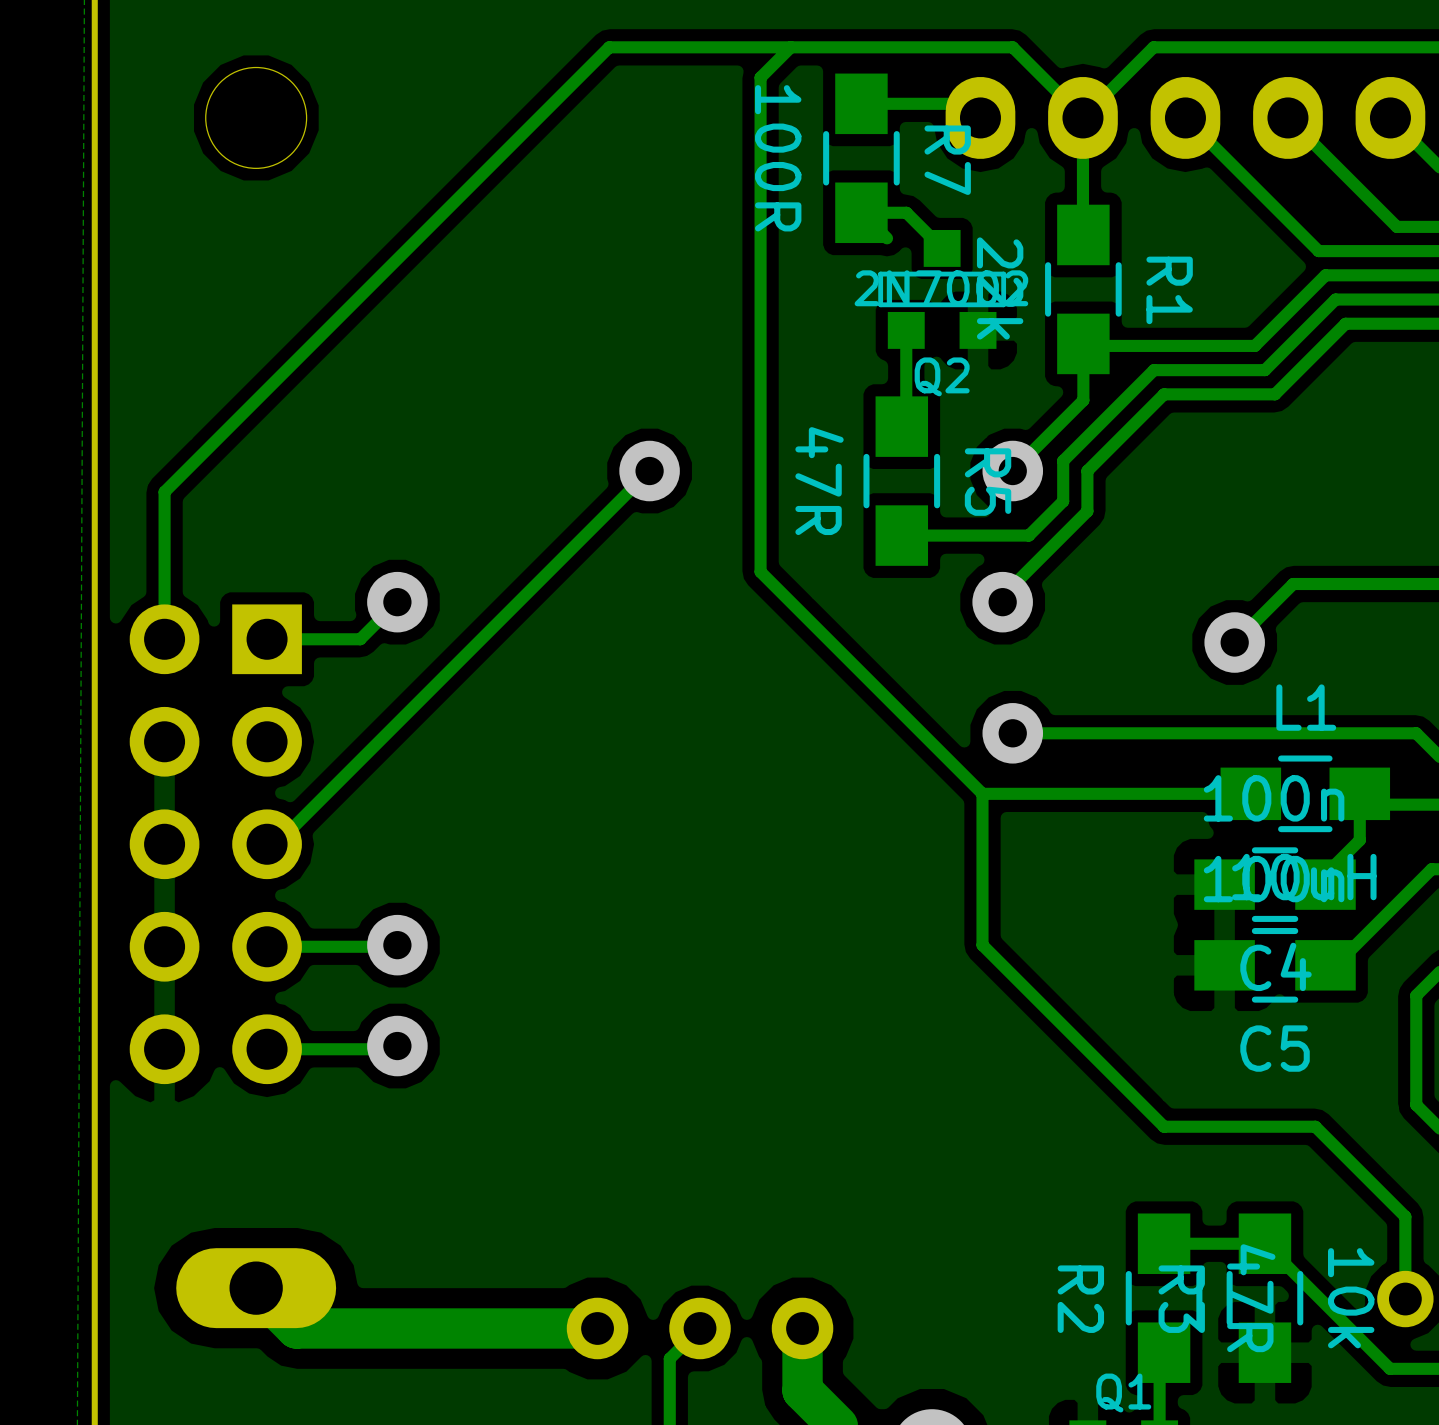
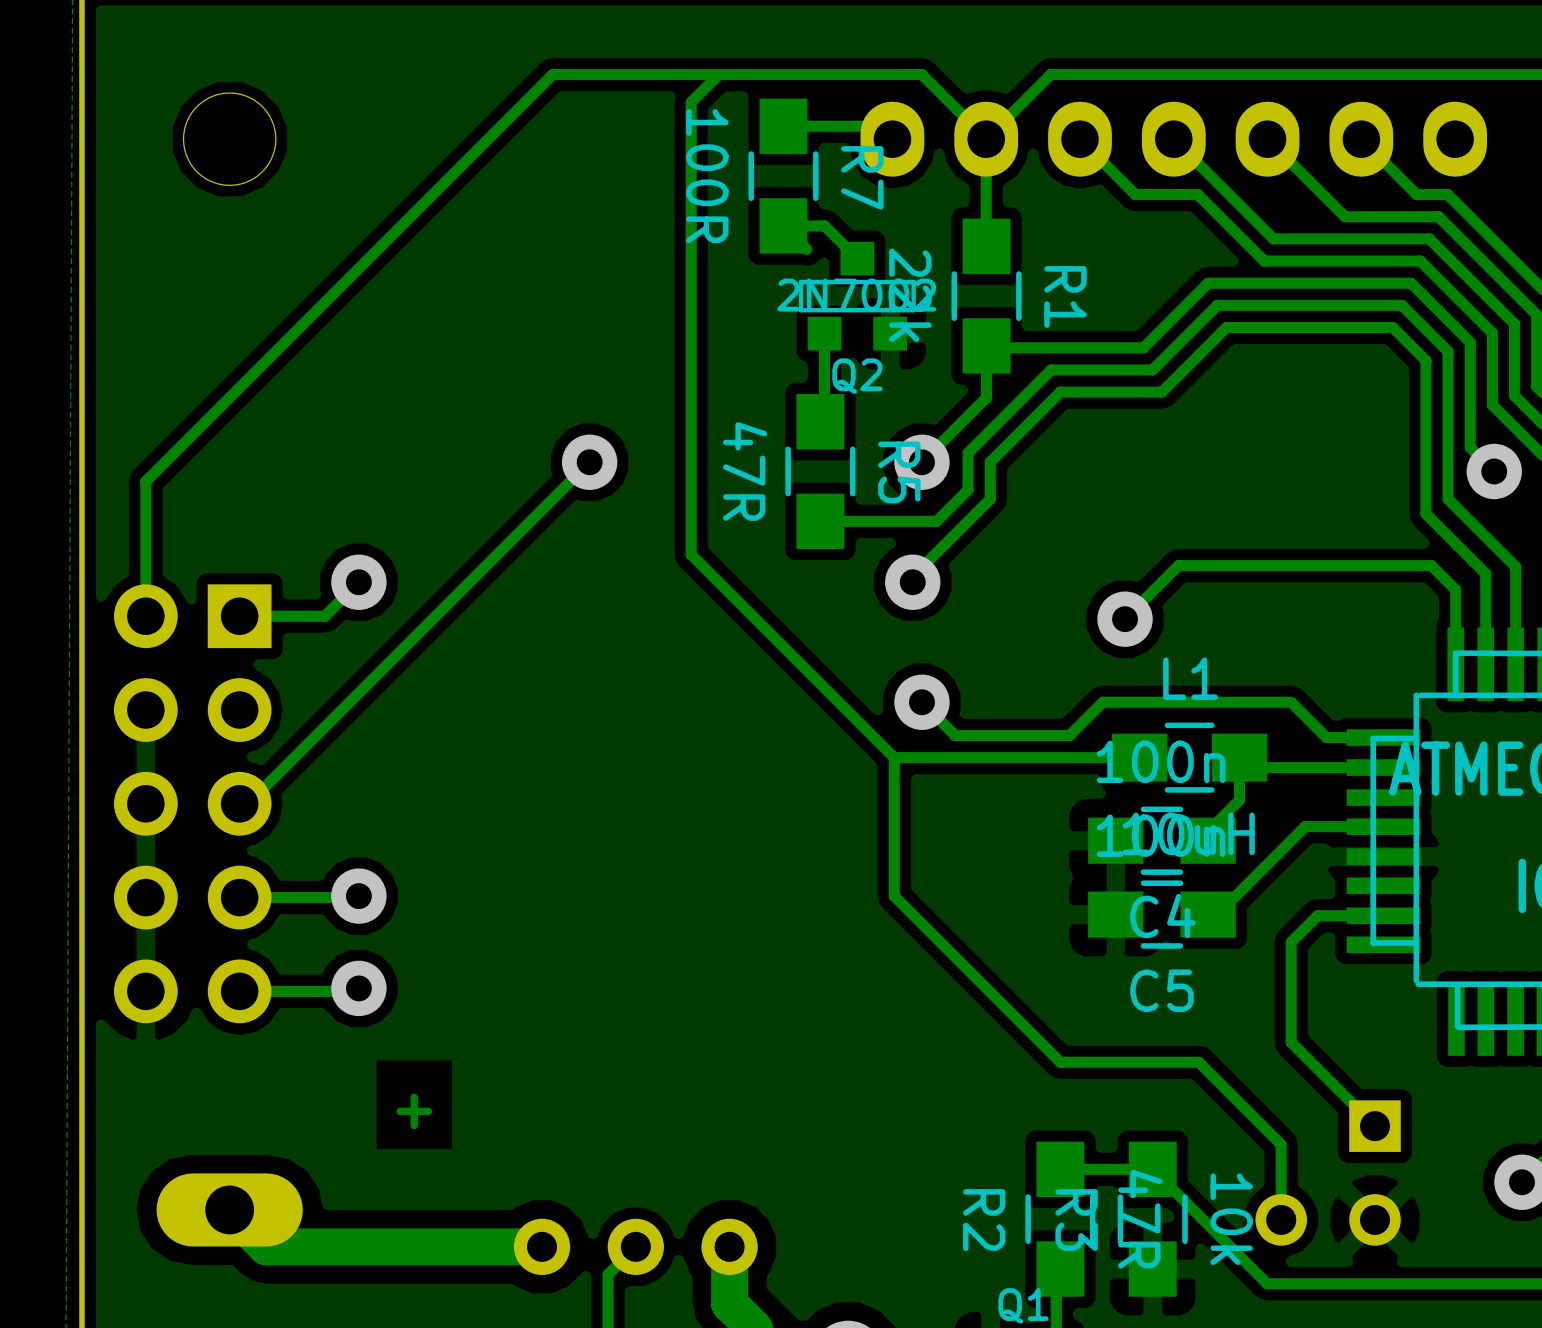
track: (1245, 178) (1318, 251) (1386, 251) -> (1135, 194) (1197, 194) (1264, 261)
track: (1210, 733) (1012, 733) -> (1102, 702) (1069, 735) (955, 735) (921, 702)
text: none -> + (414, 1111)

